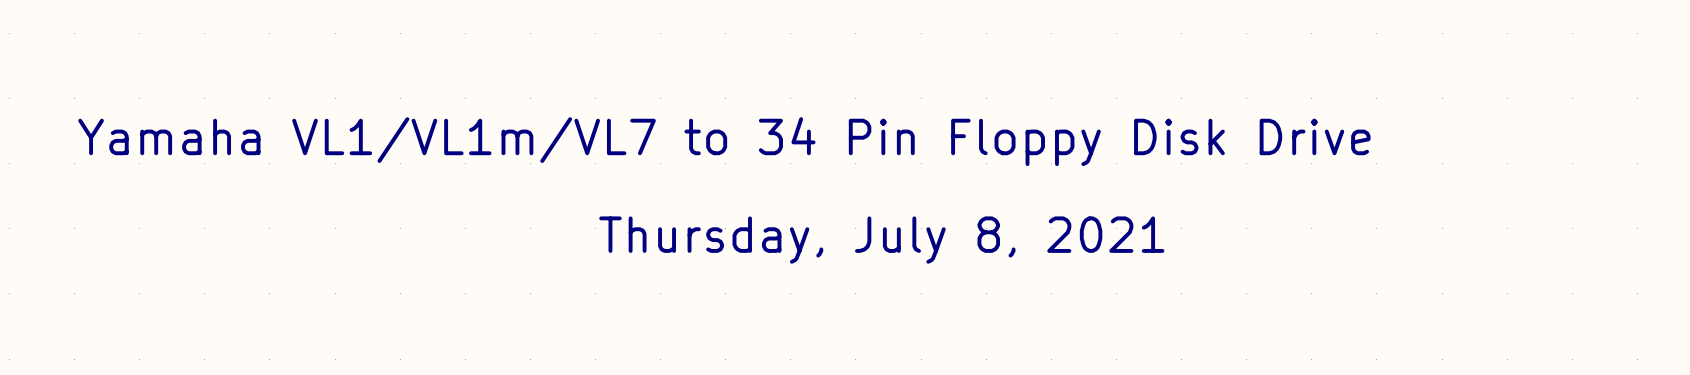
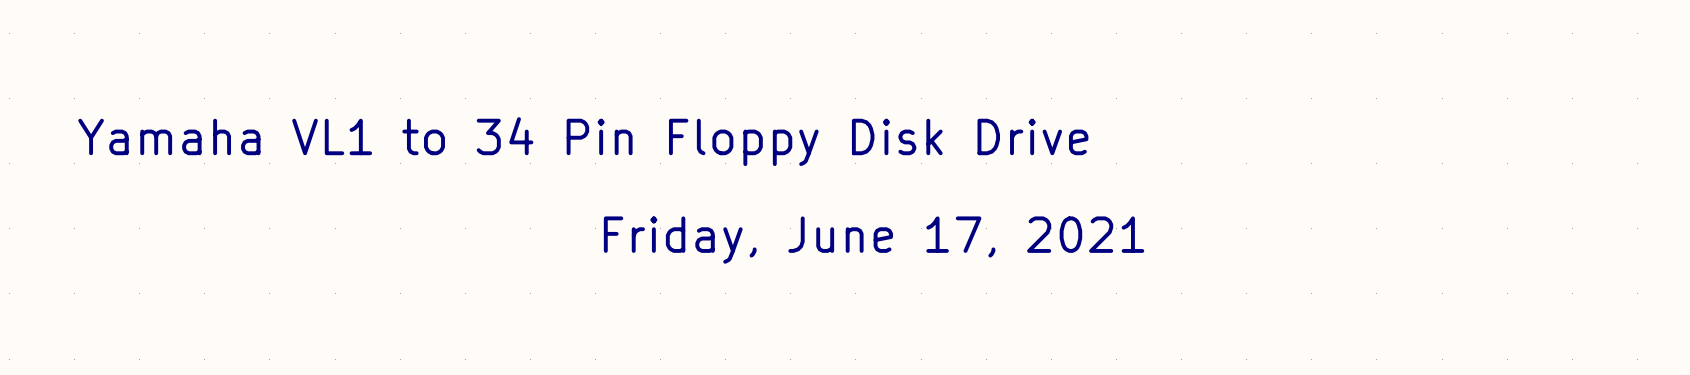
text: Yamaha VL1/VL1m/VL7 to 34 Pin Floppy Disk Drive (724, 141) -> Yamaha VL1 to 34 Pin Floppy Disk Drive (583, 141)
text: Thursday, July 8, 2021 (881, 240) -> Friday, June 17, 2021 (874, 240)

